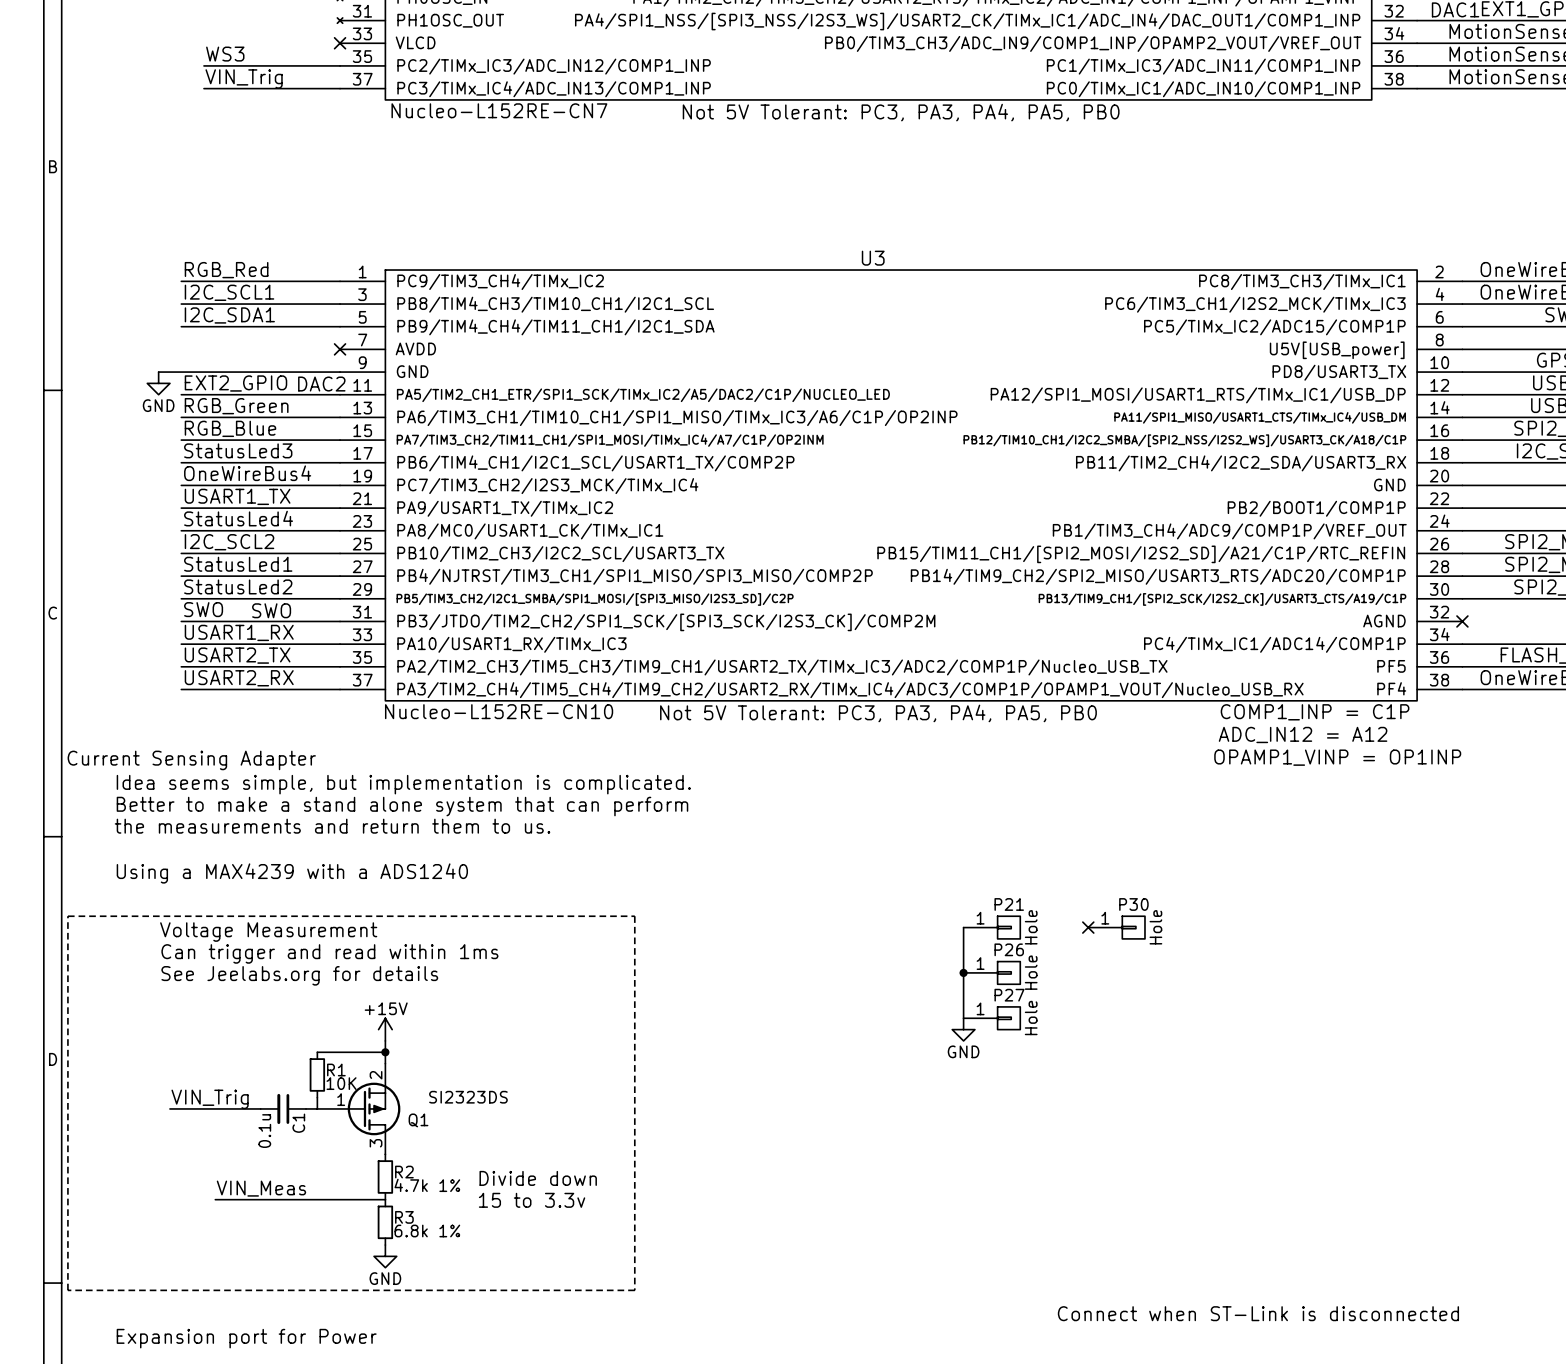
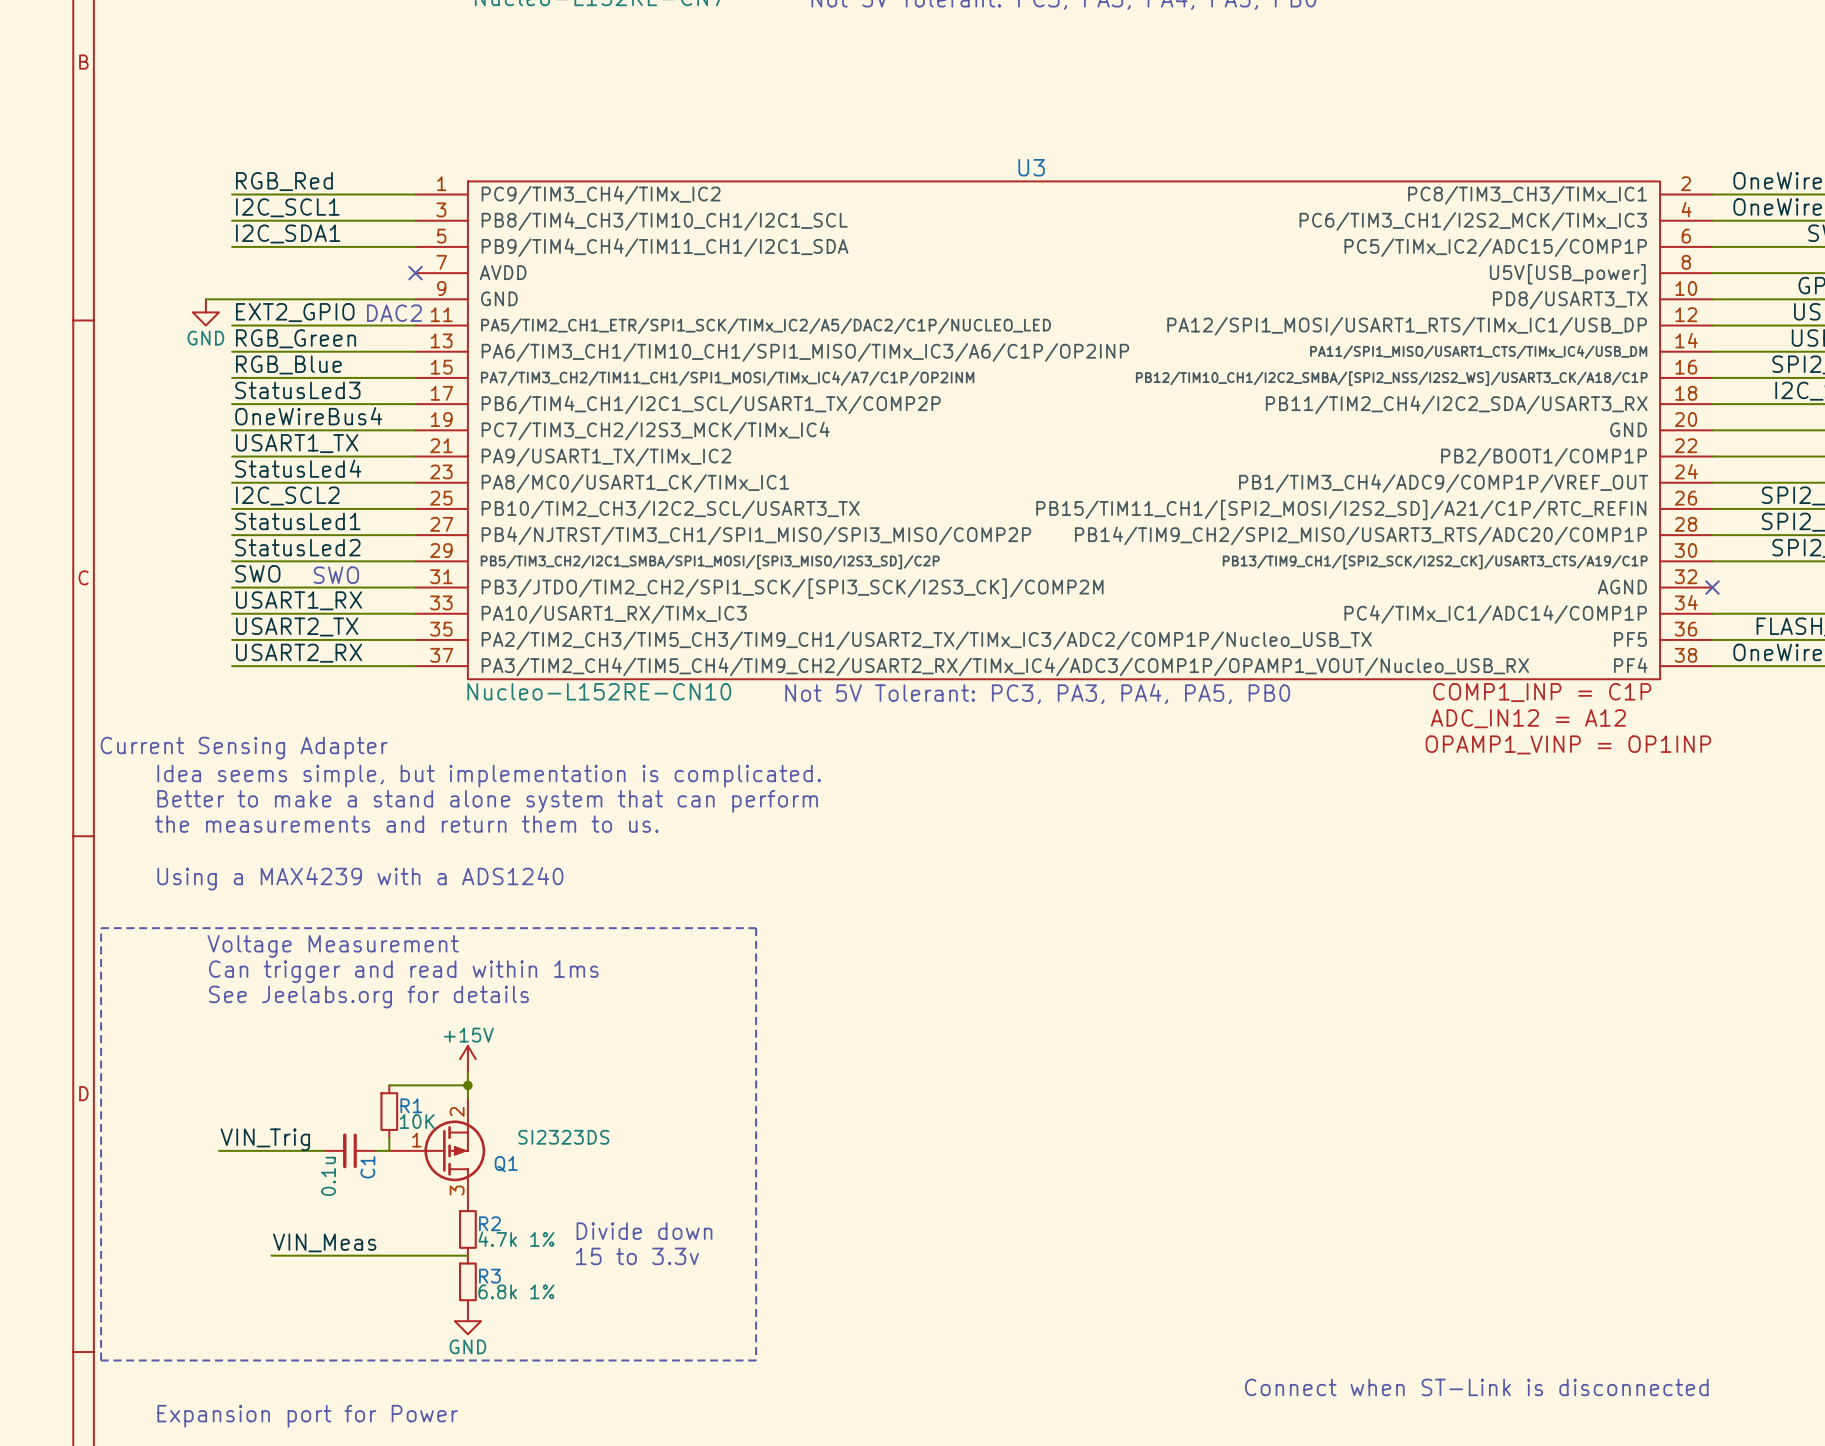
wire: (963, 927) (963, 1018) -> none
P21: Hole (991, 927) -> none
no-connect mark: (1088, 927) -> none
P30: Hole (1116, 927) -> none
junction: (963, 972) -> none
P26: Hole (991, 972) -> none
P27: Hole (991, 1018) -> none
power symbol: GND (963, 1029) -> none

